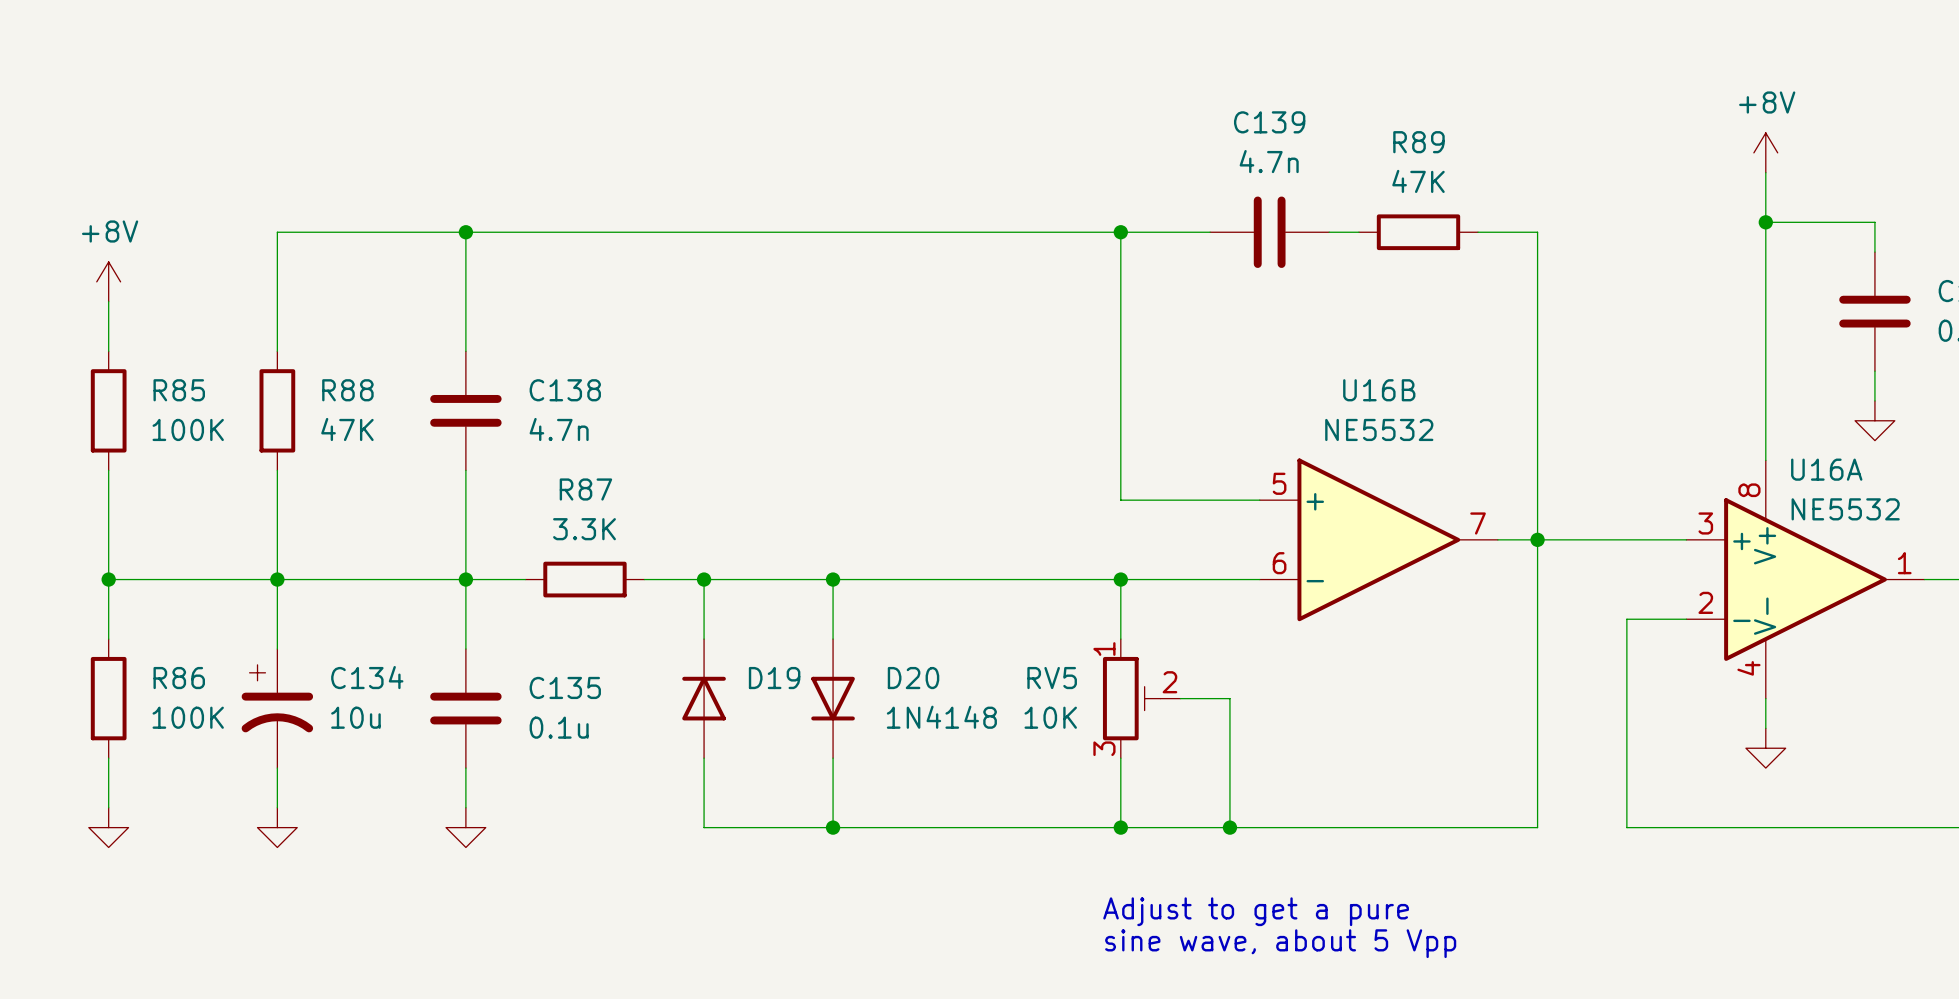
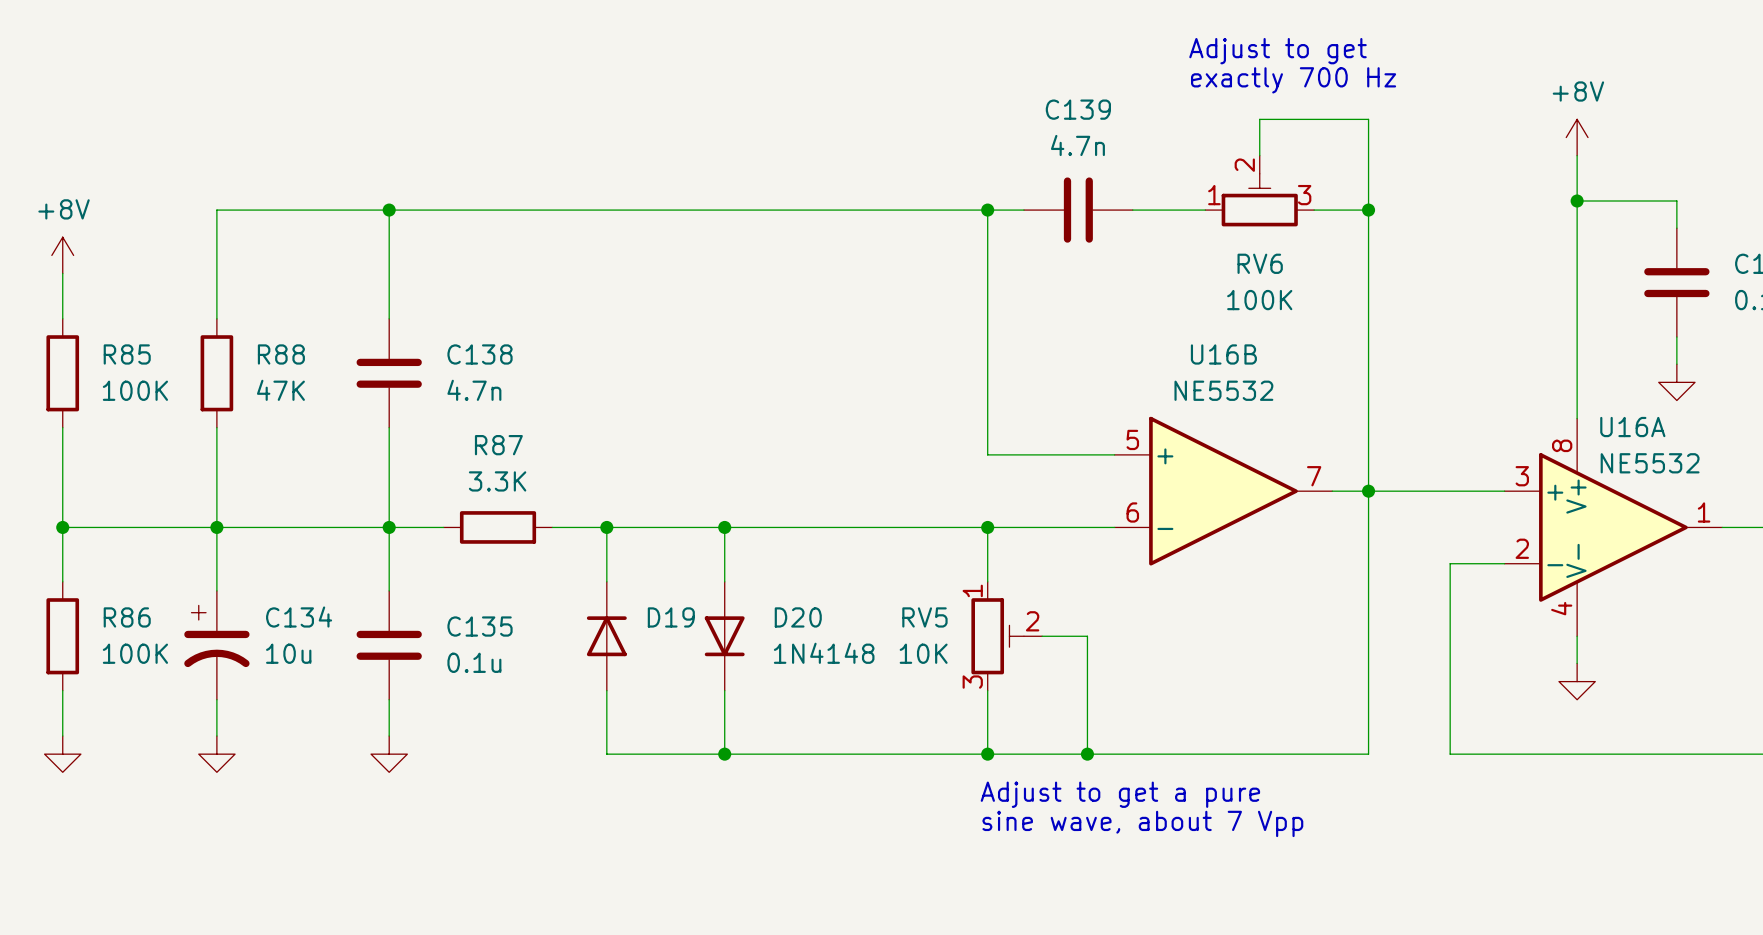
text: none -> Adjust to get (1278, 51)
text: none -> exactly 700 Hz (1293, 80)
wire: none -> (1259, 155) (1259, 119) (1368, 119) (1368, 210)
RV6: none -> 100K (1259, 191)
C139 position: (1269, 232) -> (1078, 210)
R89: 47K (1418, 232) -> none
junction: none -> (1368, 210)
text position: Adjust to get a pure (1256, 911) -> Adjust to get a pure (1120, 794)
text: sine wave, about 5 Vpp (1280, 943) -> sine wave, about 7 Vpp (1142, 823)

